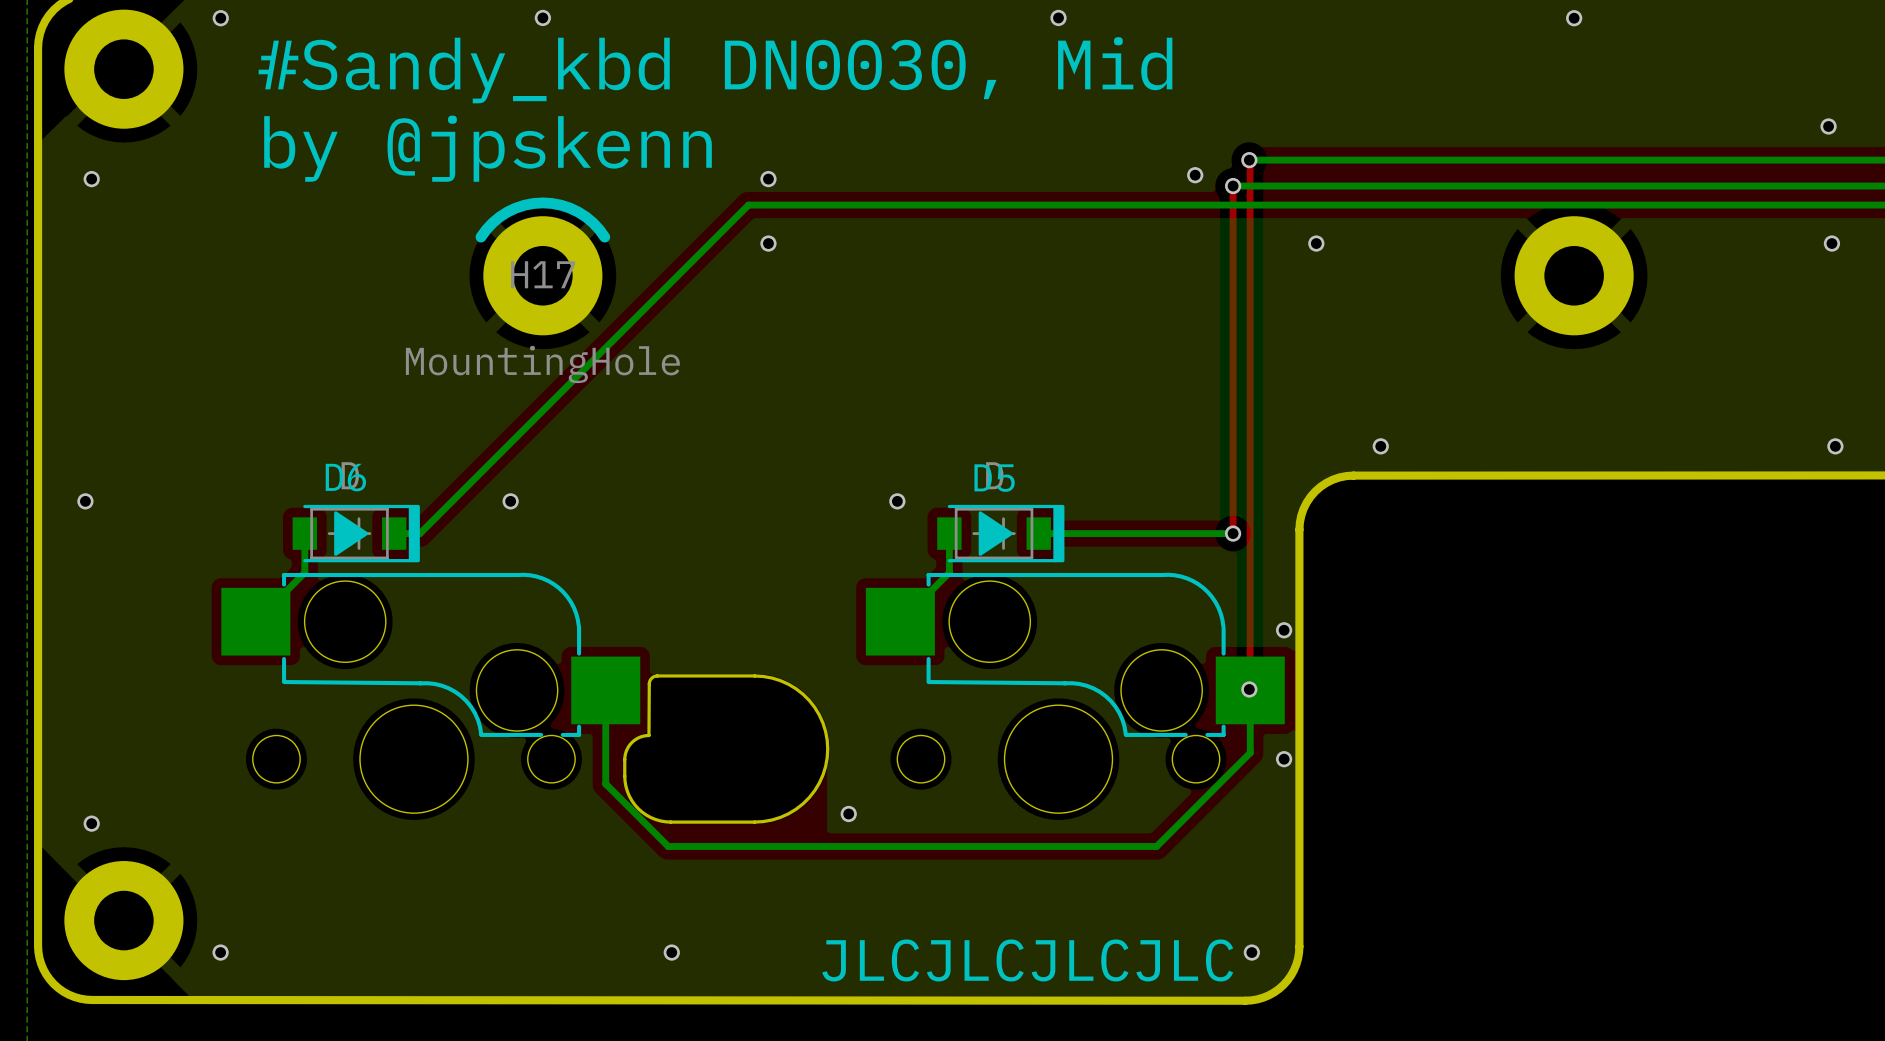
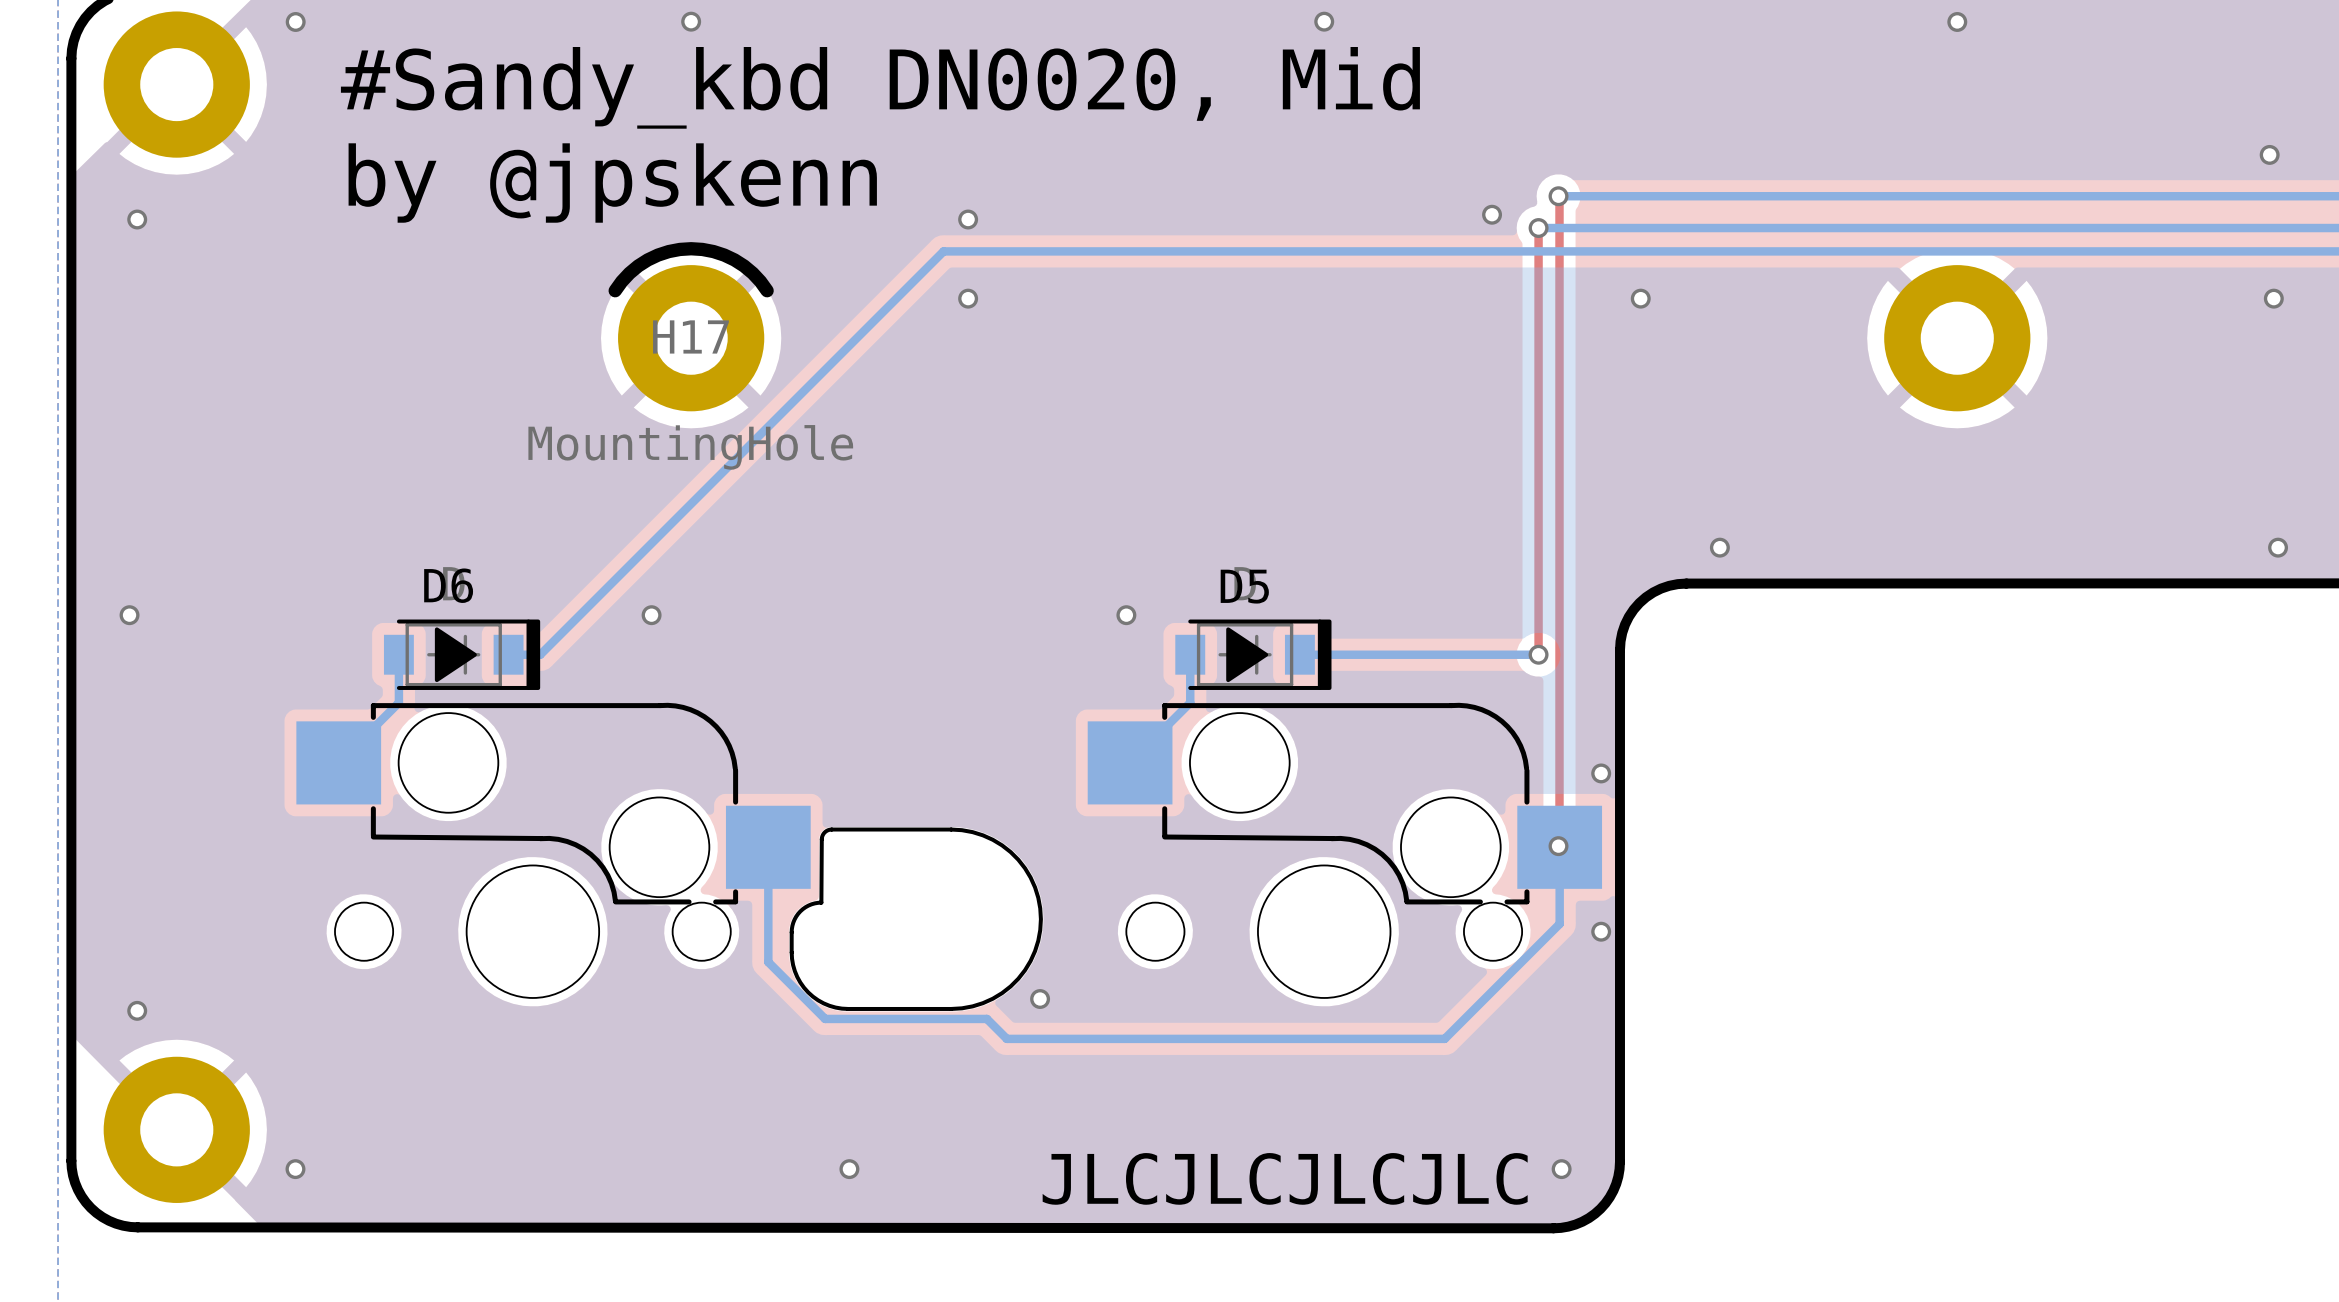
text: #Sandy_kbd DN0030, Mid (715, 70) -> #Sandy_kbd DN0020, Mid (880, 87)
via position: (848, 813) -> (1040, 999)
bottom track: (652, 830) (668, 846) (800, 846) -> (825, 1018) (986, 1018) (1006, 1038)

